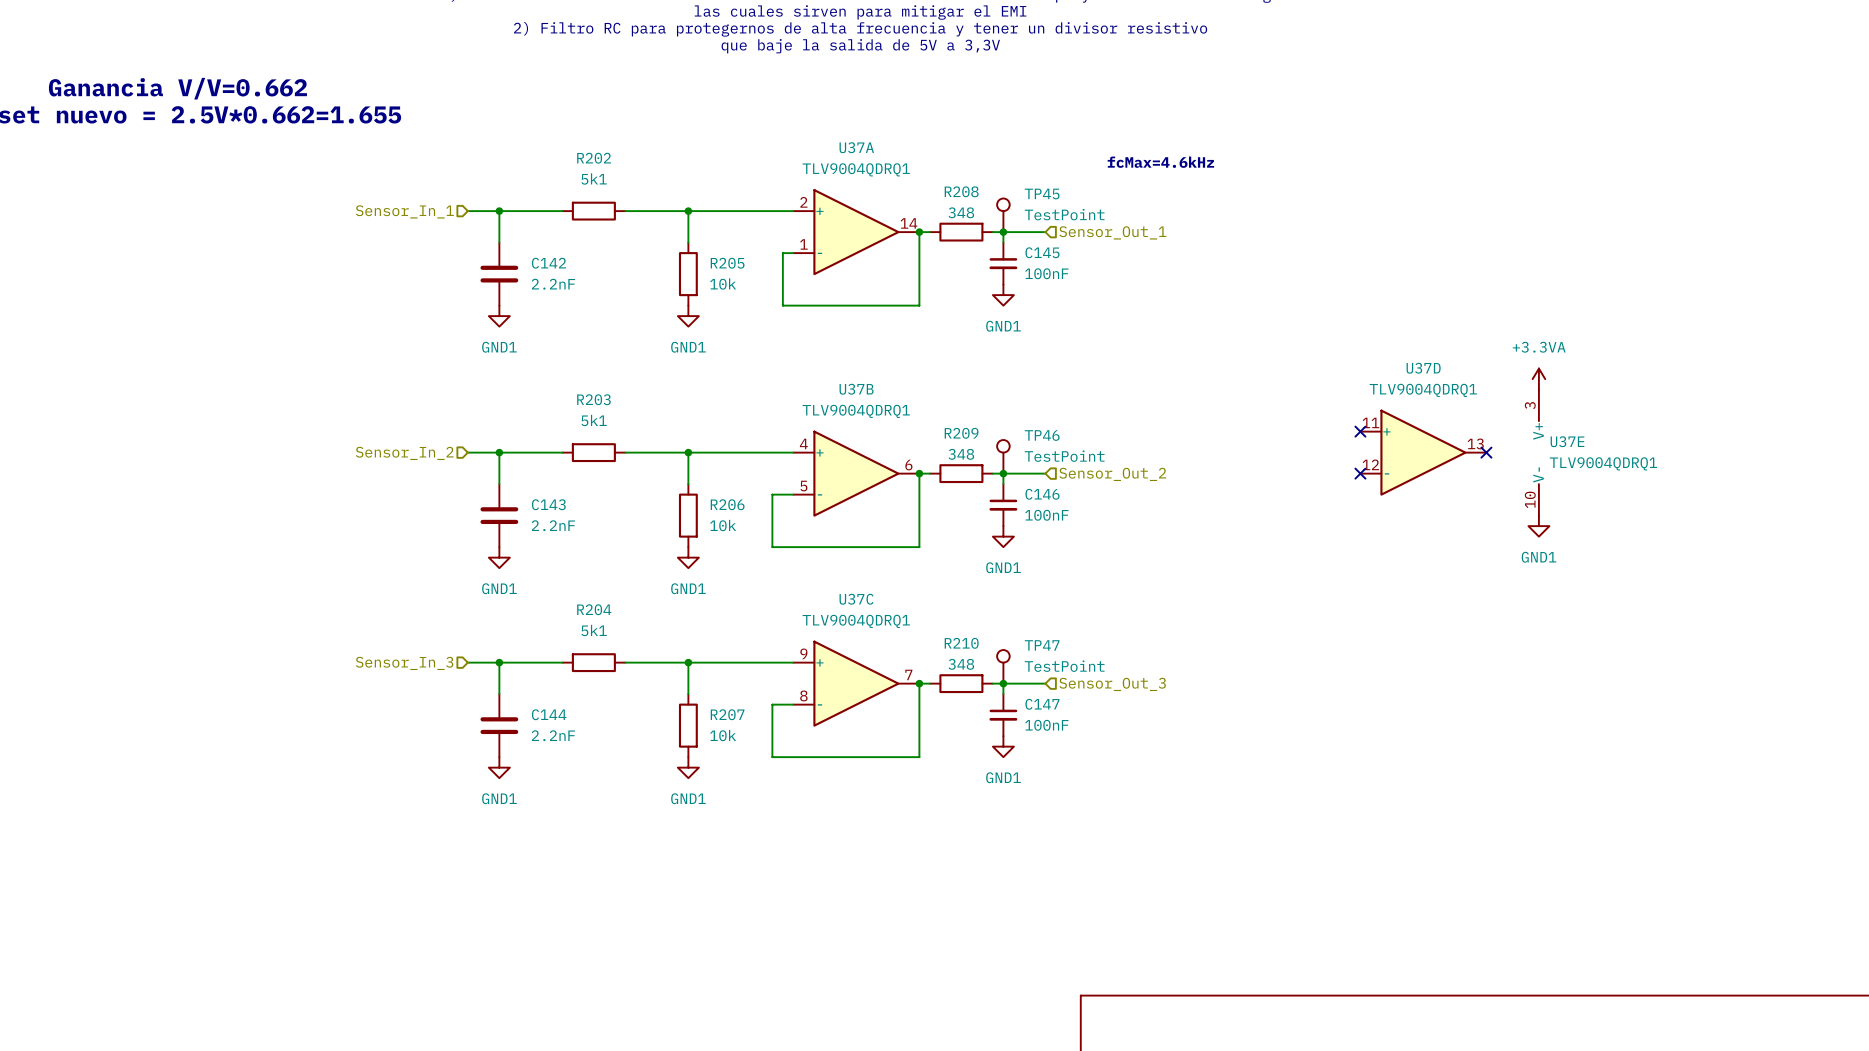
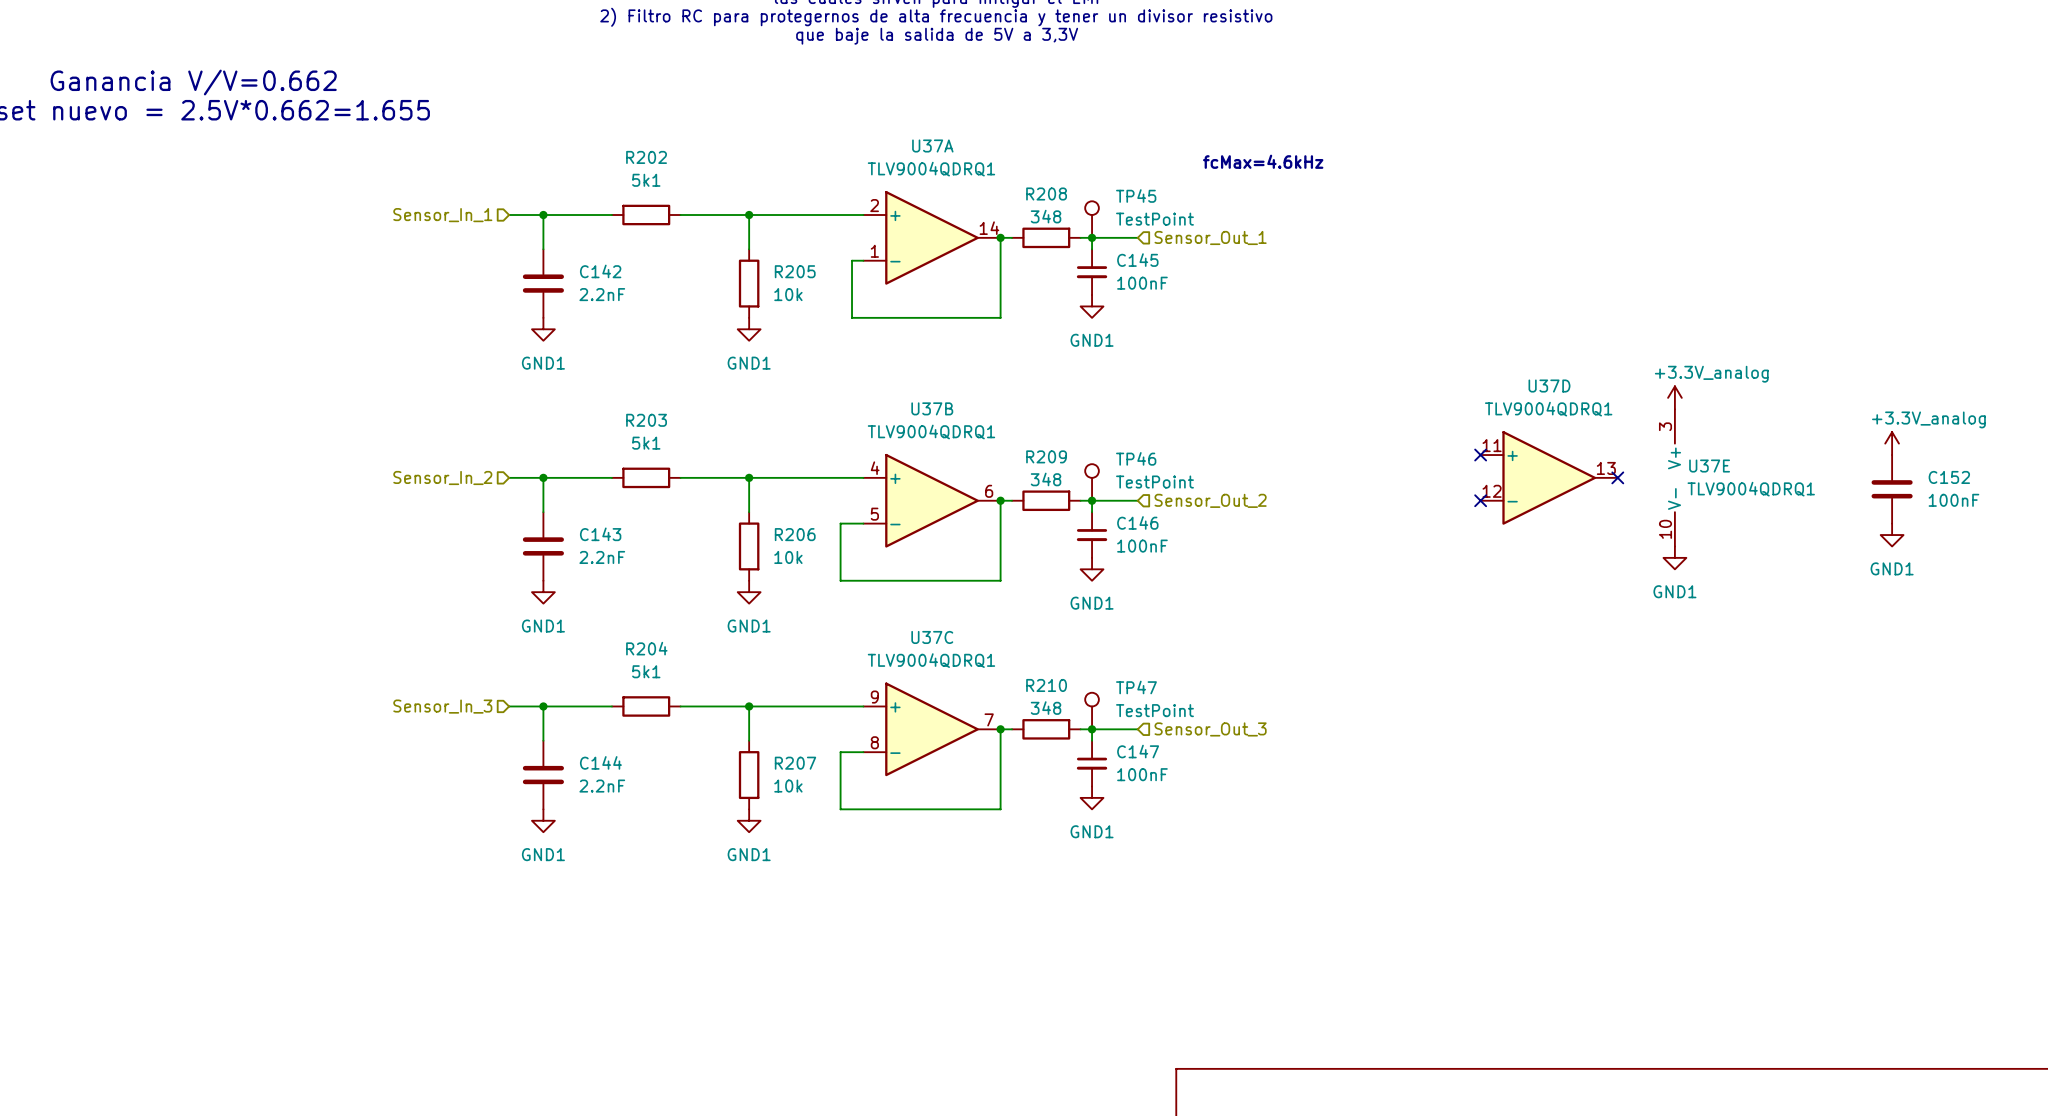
power symbol: +3.3VA (1538, 379) -> +3.3V_analog (1674, 397)
power symbol: none -> +3.3V_analog (1892, 443)
C152: none -> 100nF (1892, 489)
power symbol: none -> GND1 (1892, 535)

